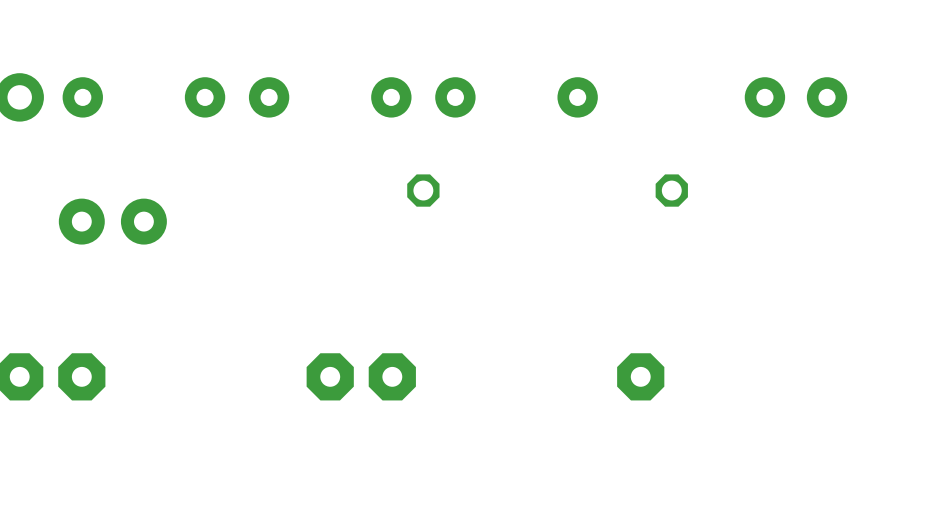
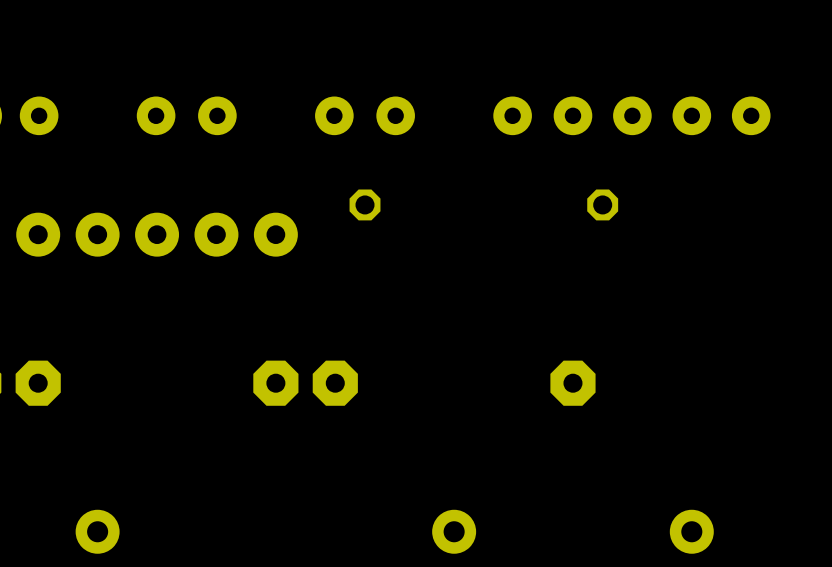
part: none -> (602, 115)
part: none -> (216, 234)

